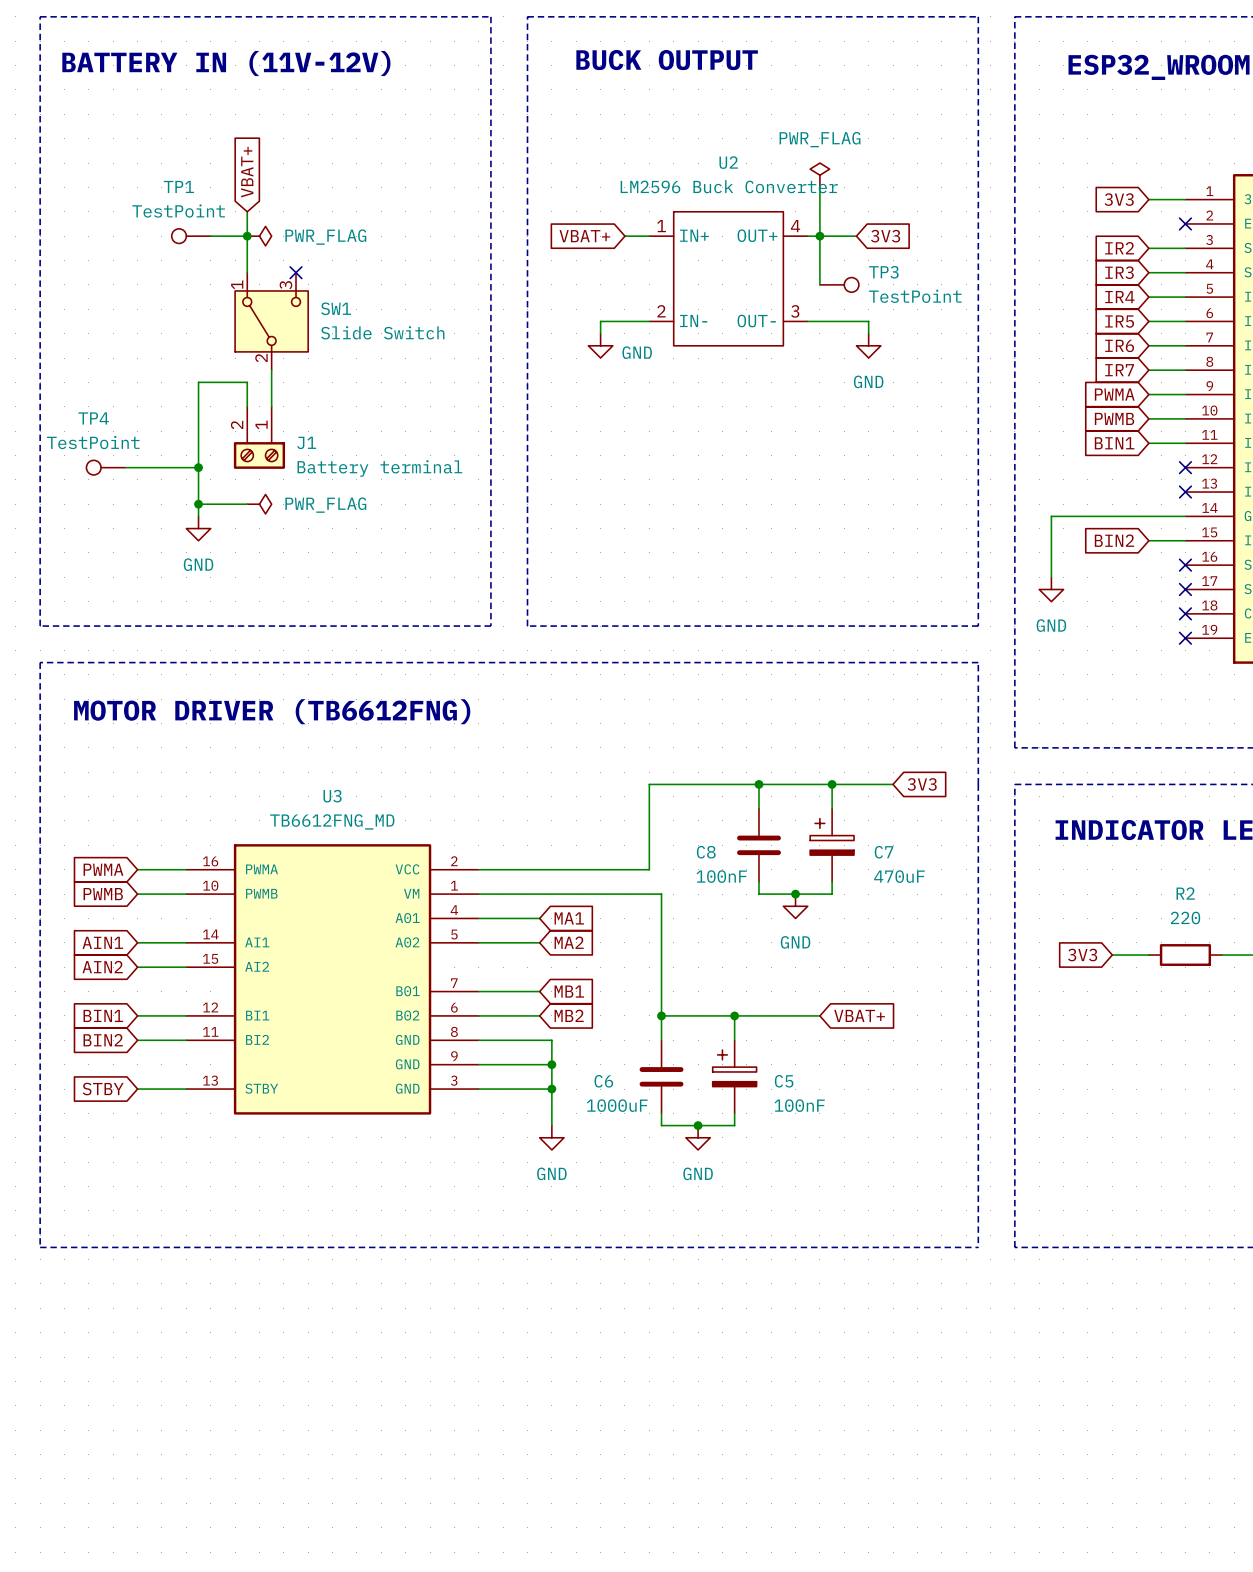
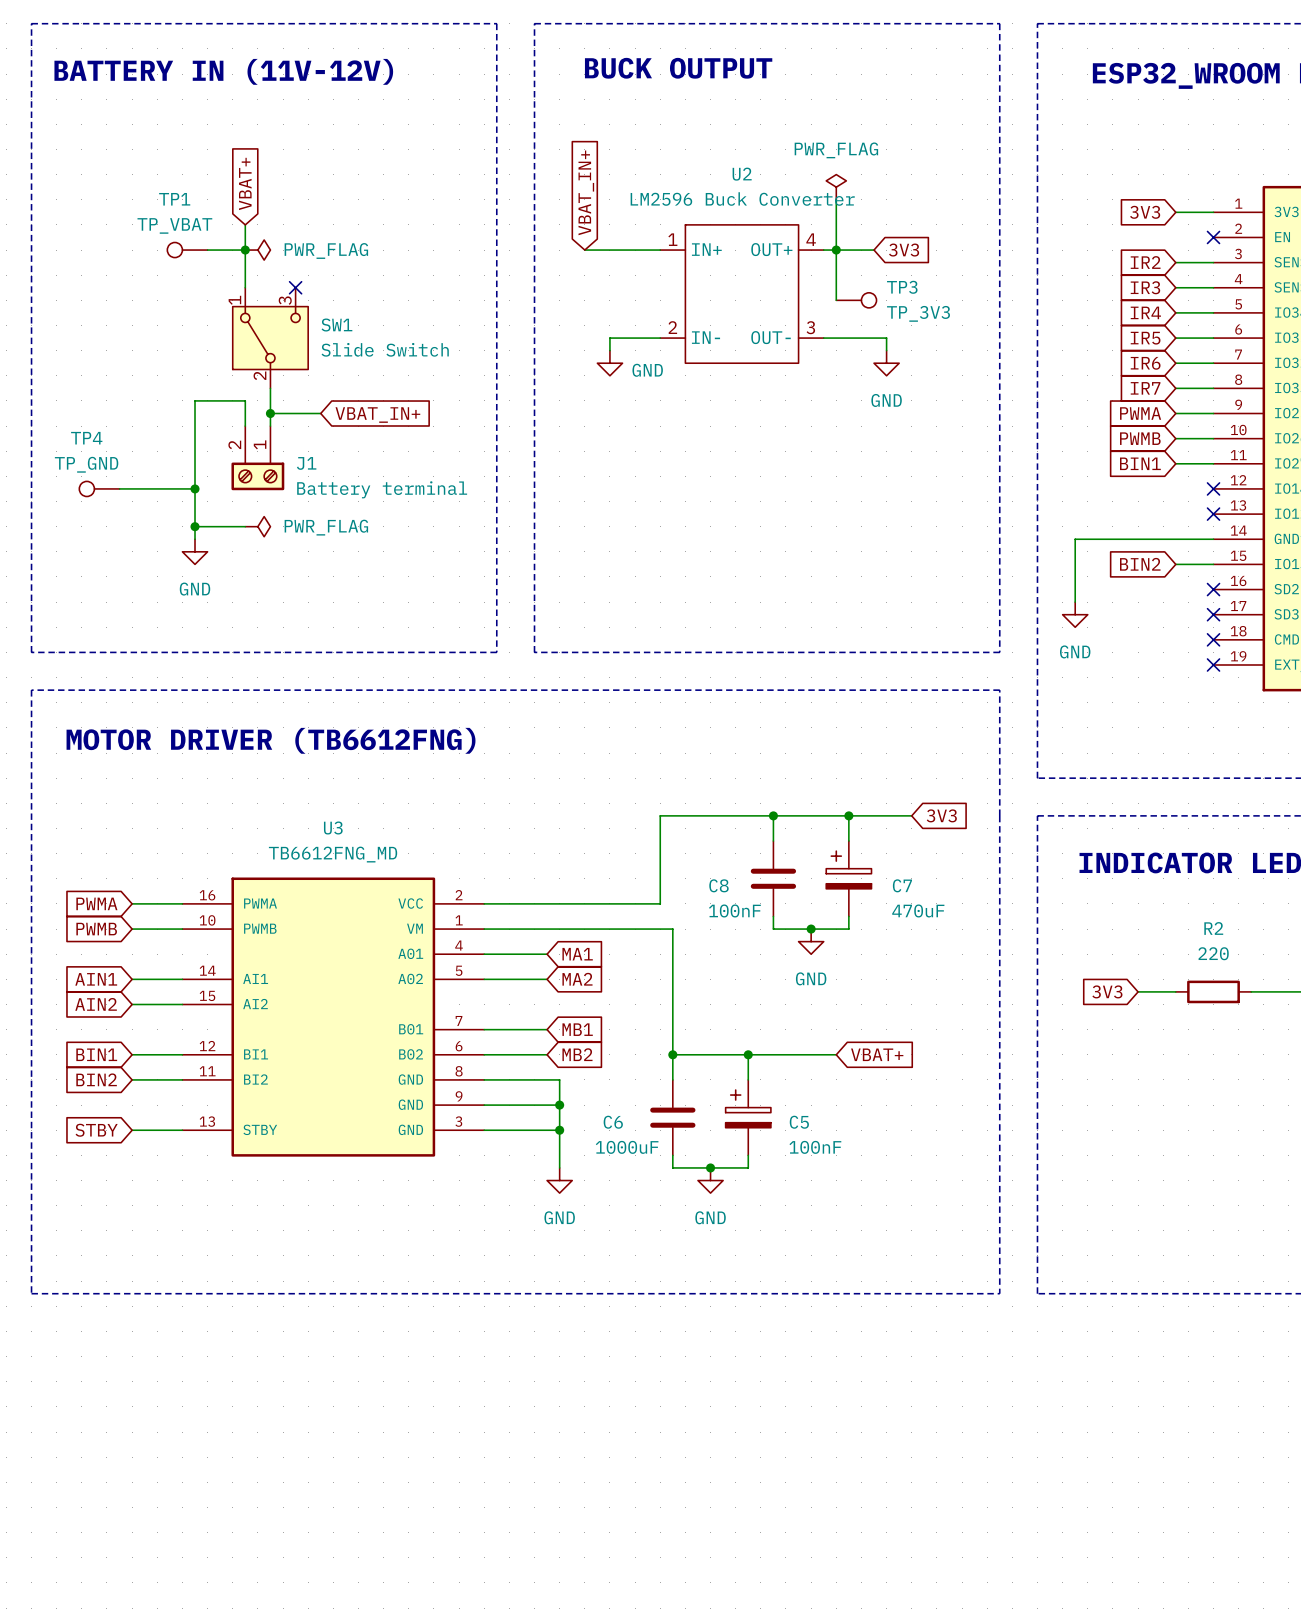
TP1 value: TestPoint (178, 211) -> TP_VBAT (174, 225)
wire: none -> (584, 250) (635, 250)
global label: VBAT+ (584, 236) -> VBAT_IN+ (586, 192)
TP3 value: TestPoint (915, 296) -> TP_3V3 (918, 313)
wire: none -> (270, 413) (320, 413)
junction: none -> (270, 413)
global label: none -> VBAT_IN+ (377, 415)
TP4 value: TestPoint (93, 442) -> TP_GND (86, 464)

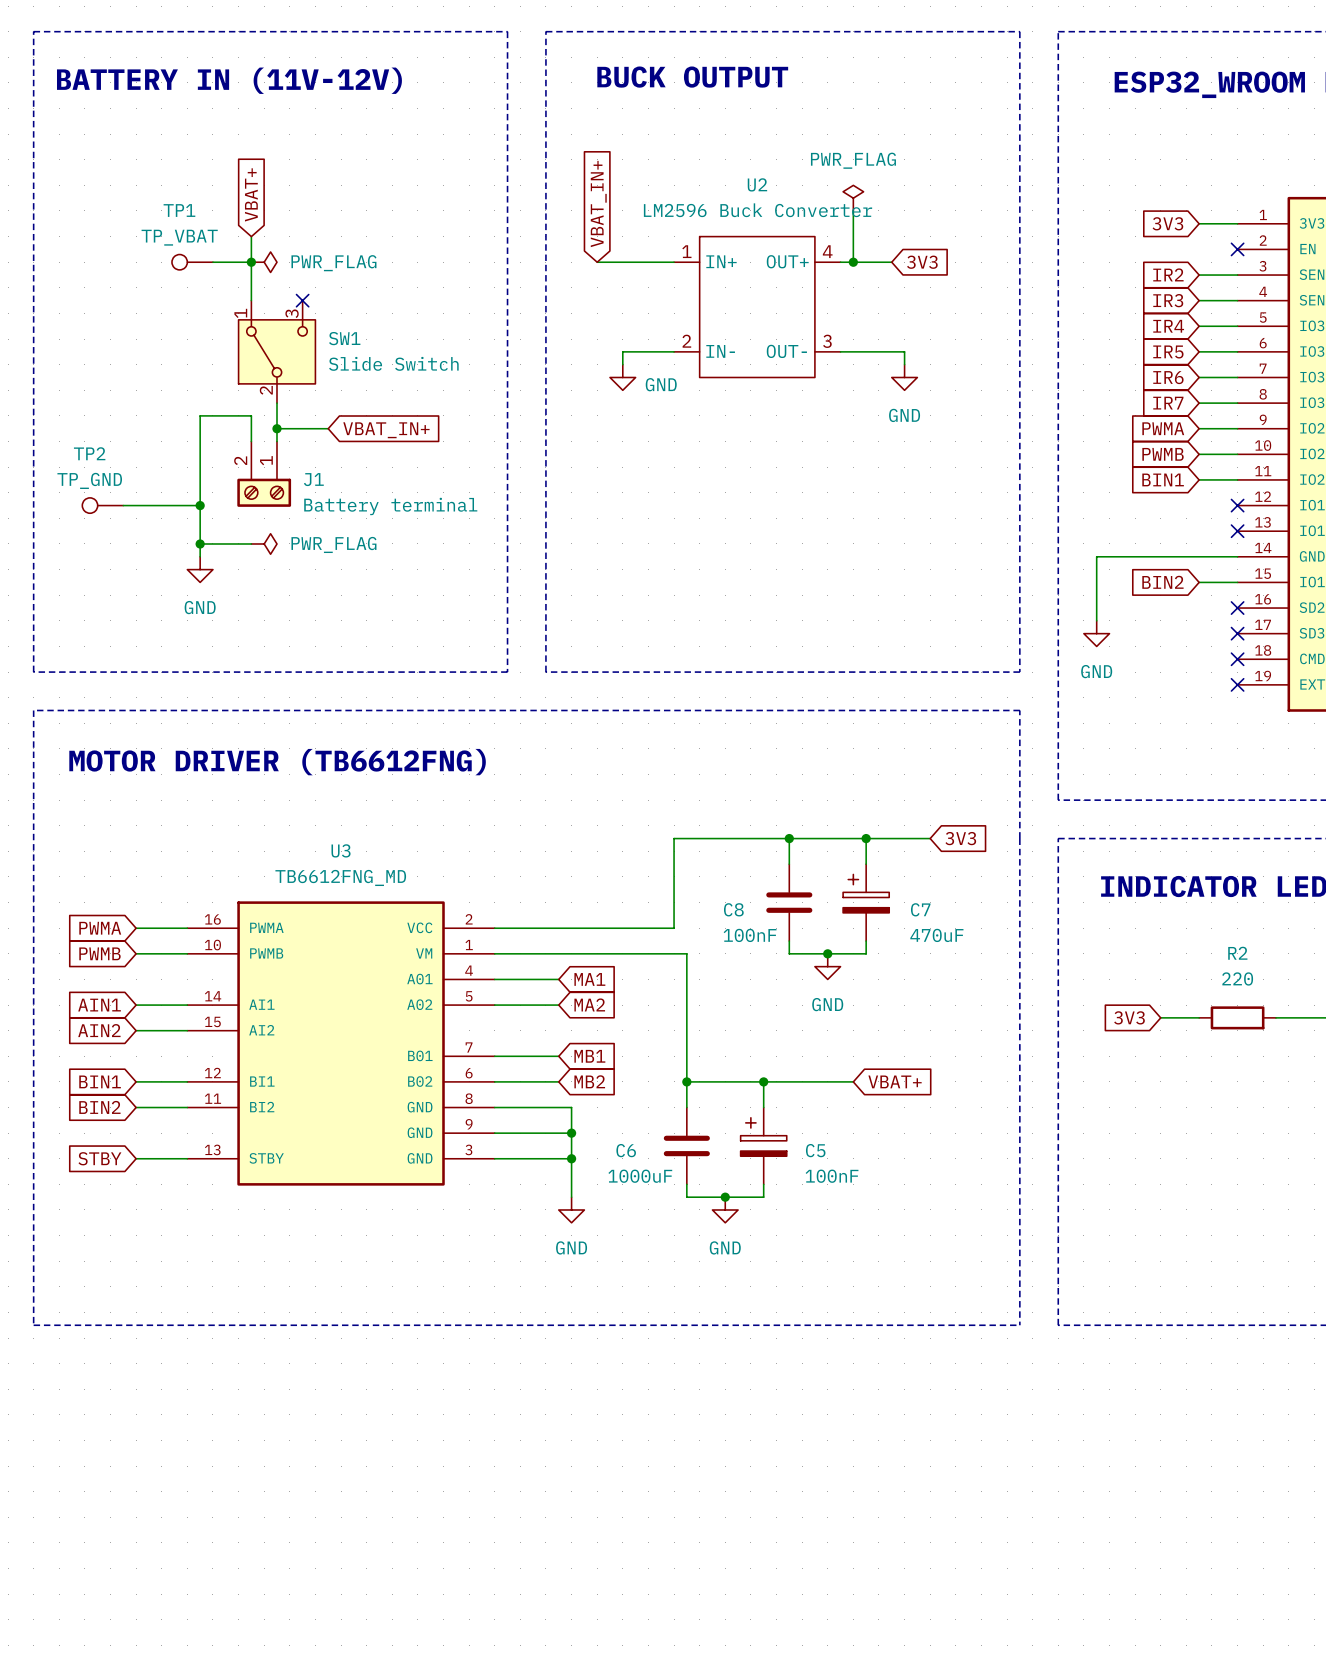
wire: (836, 250) (836, 300) -> none
TP3: TP_3V3 (856, 300) -> none
TP4 name: TP4 (86, 438) -> TP2 (89, 453)

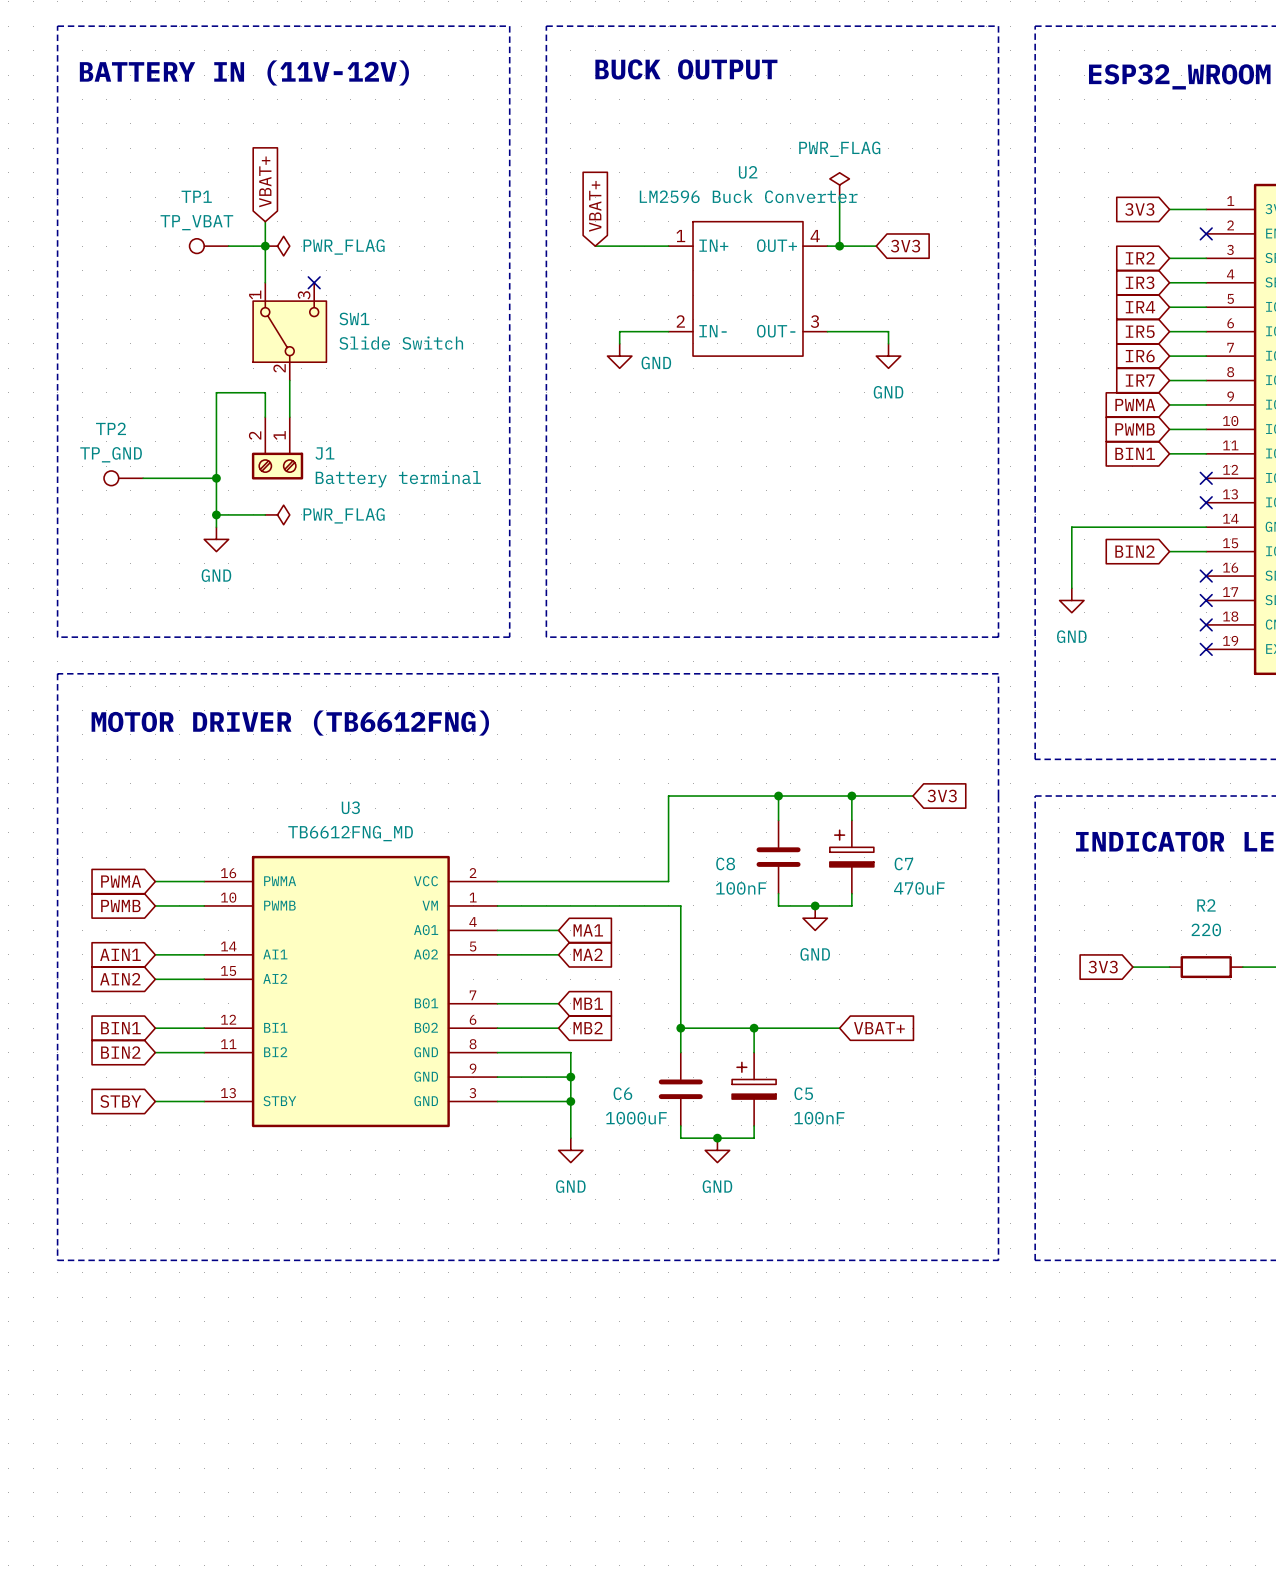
global label: VBAT_IN+ (598, 204) -> VBAT+ (595, 206)
wire: (276, 428) (328, 428) -> none
junction: (276, 428) -> none
global label: VBAT_IN+ (386, 430) -> none

